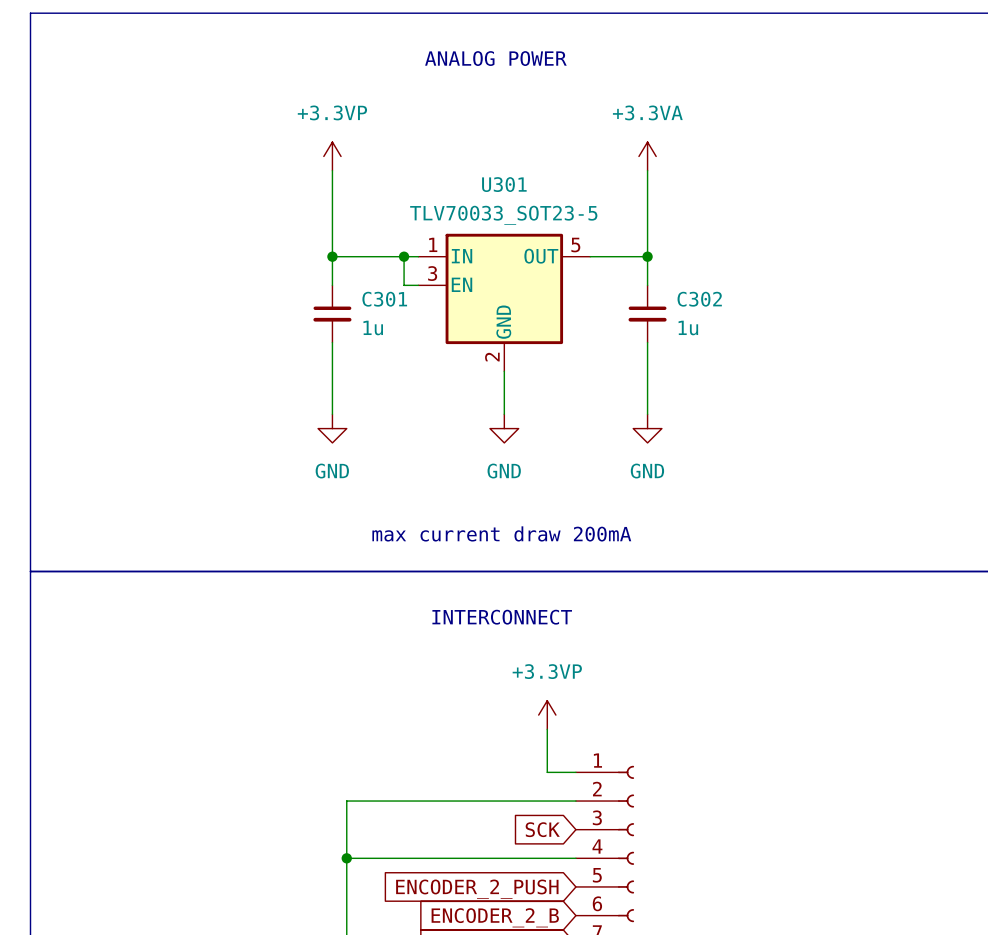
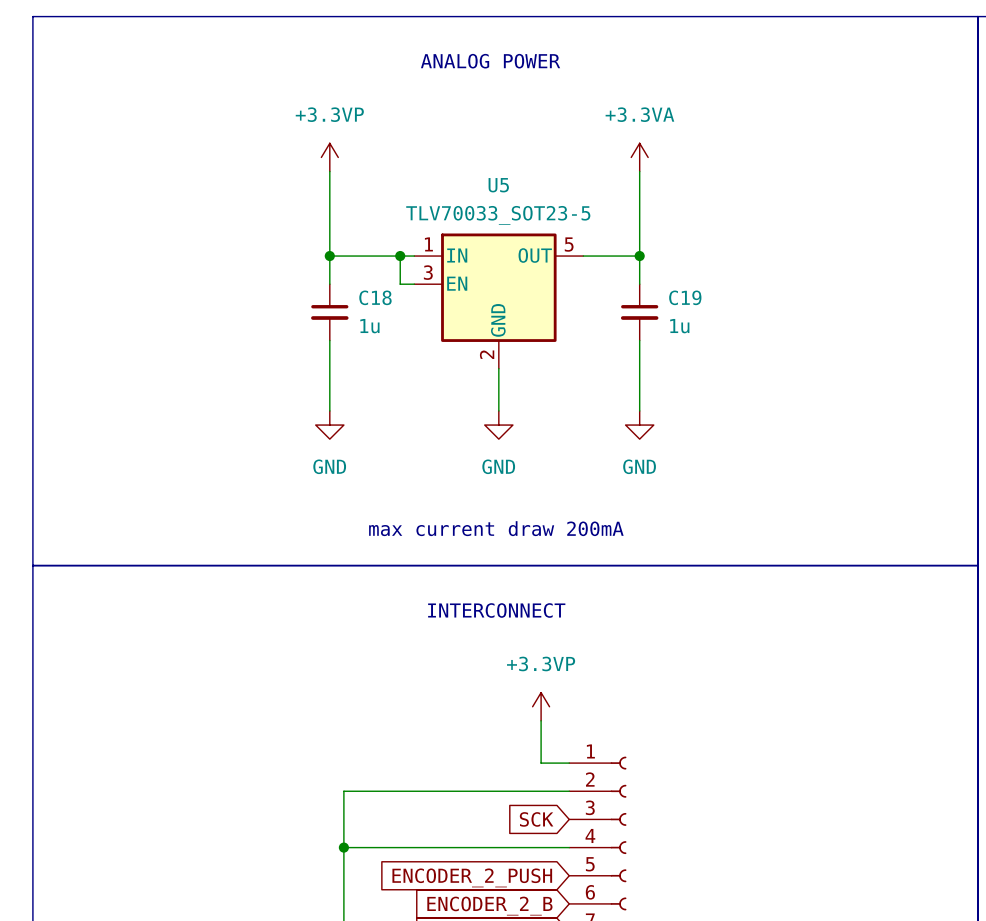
U301 name: U301 (504, 184) -> U5 (498, 185)
C301 name: C301 (384, 299) -> C18 (375, 297)
C302 name: C302 (699, 299) -> C19 (685, 297)

